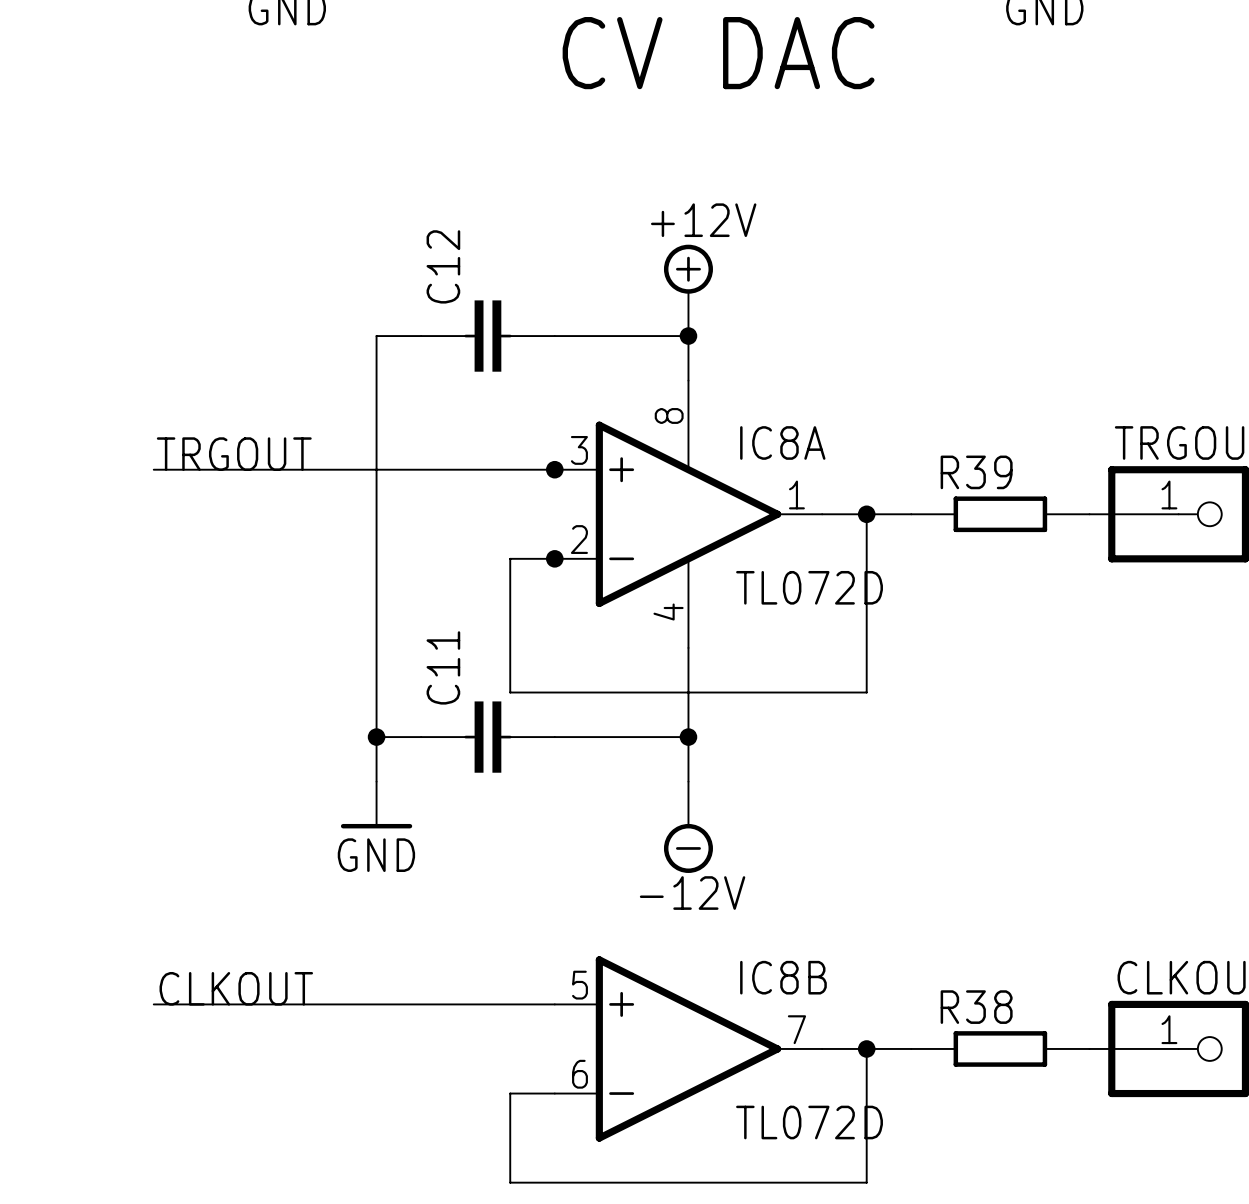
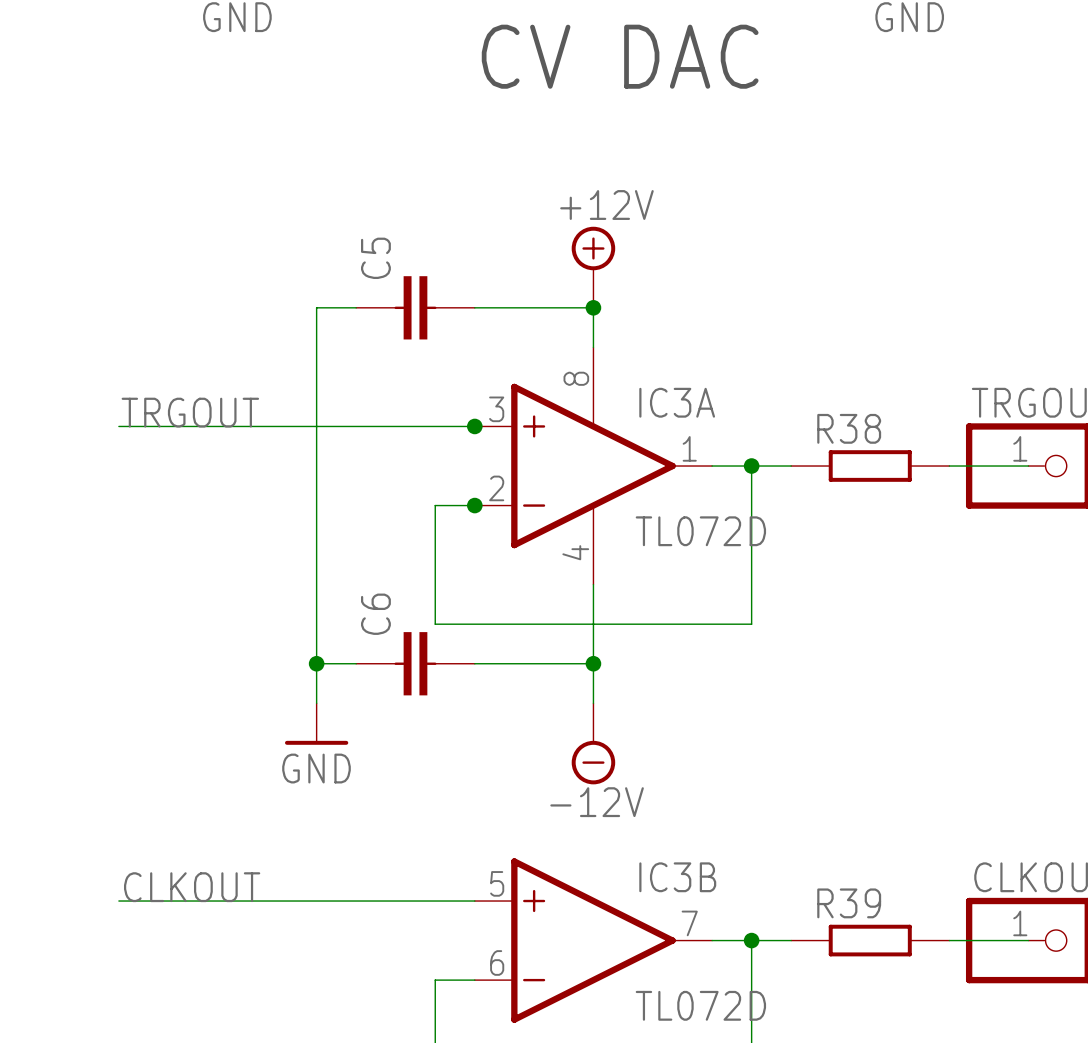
C12 name: C12 (443, 266) -> C5 (375, 258)
IC8A name: IC8A (782, 442) -> IC3A (677, 402)
R39 name: R39 (976, 472) -> R38 (849, 428)
C11 name: C11 (443, 667) -> C6 (375, 614)
IC8B name: IC8B (783, 977) -> IC3B (677, 877)
R38 name: R38 (976, 1007) -> R39 (849, 903)

